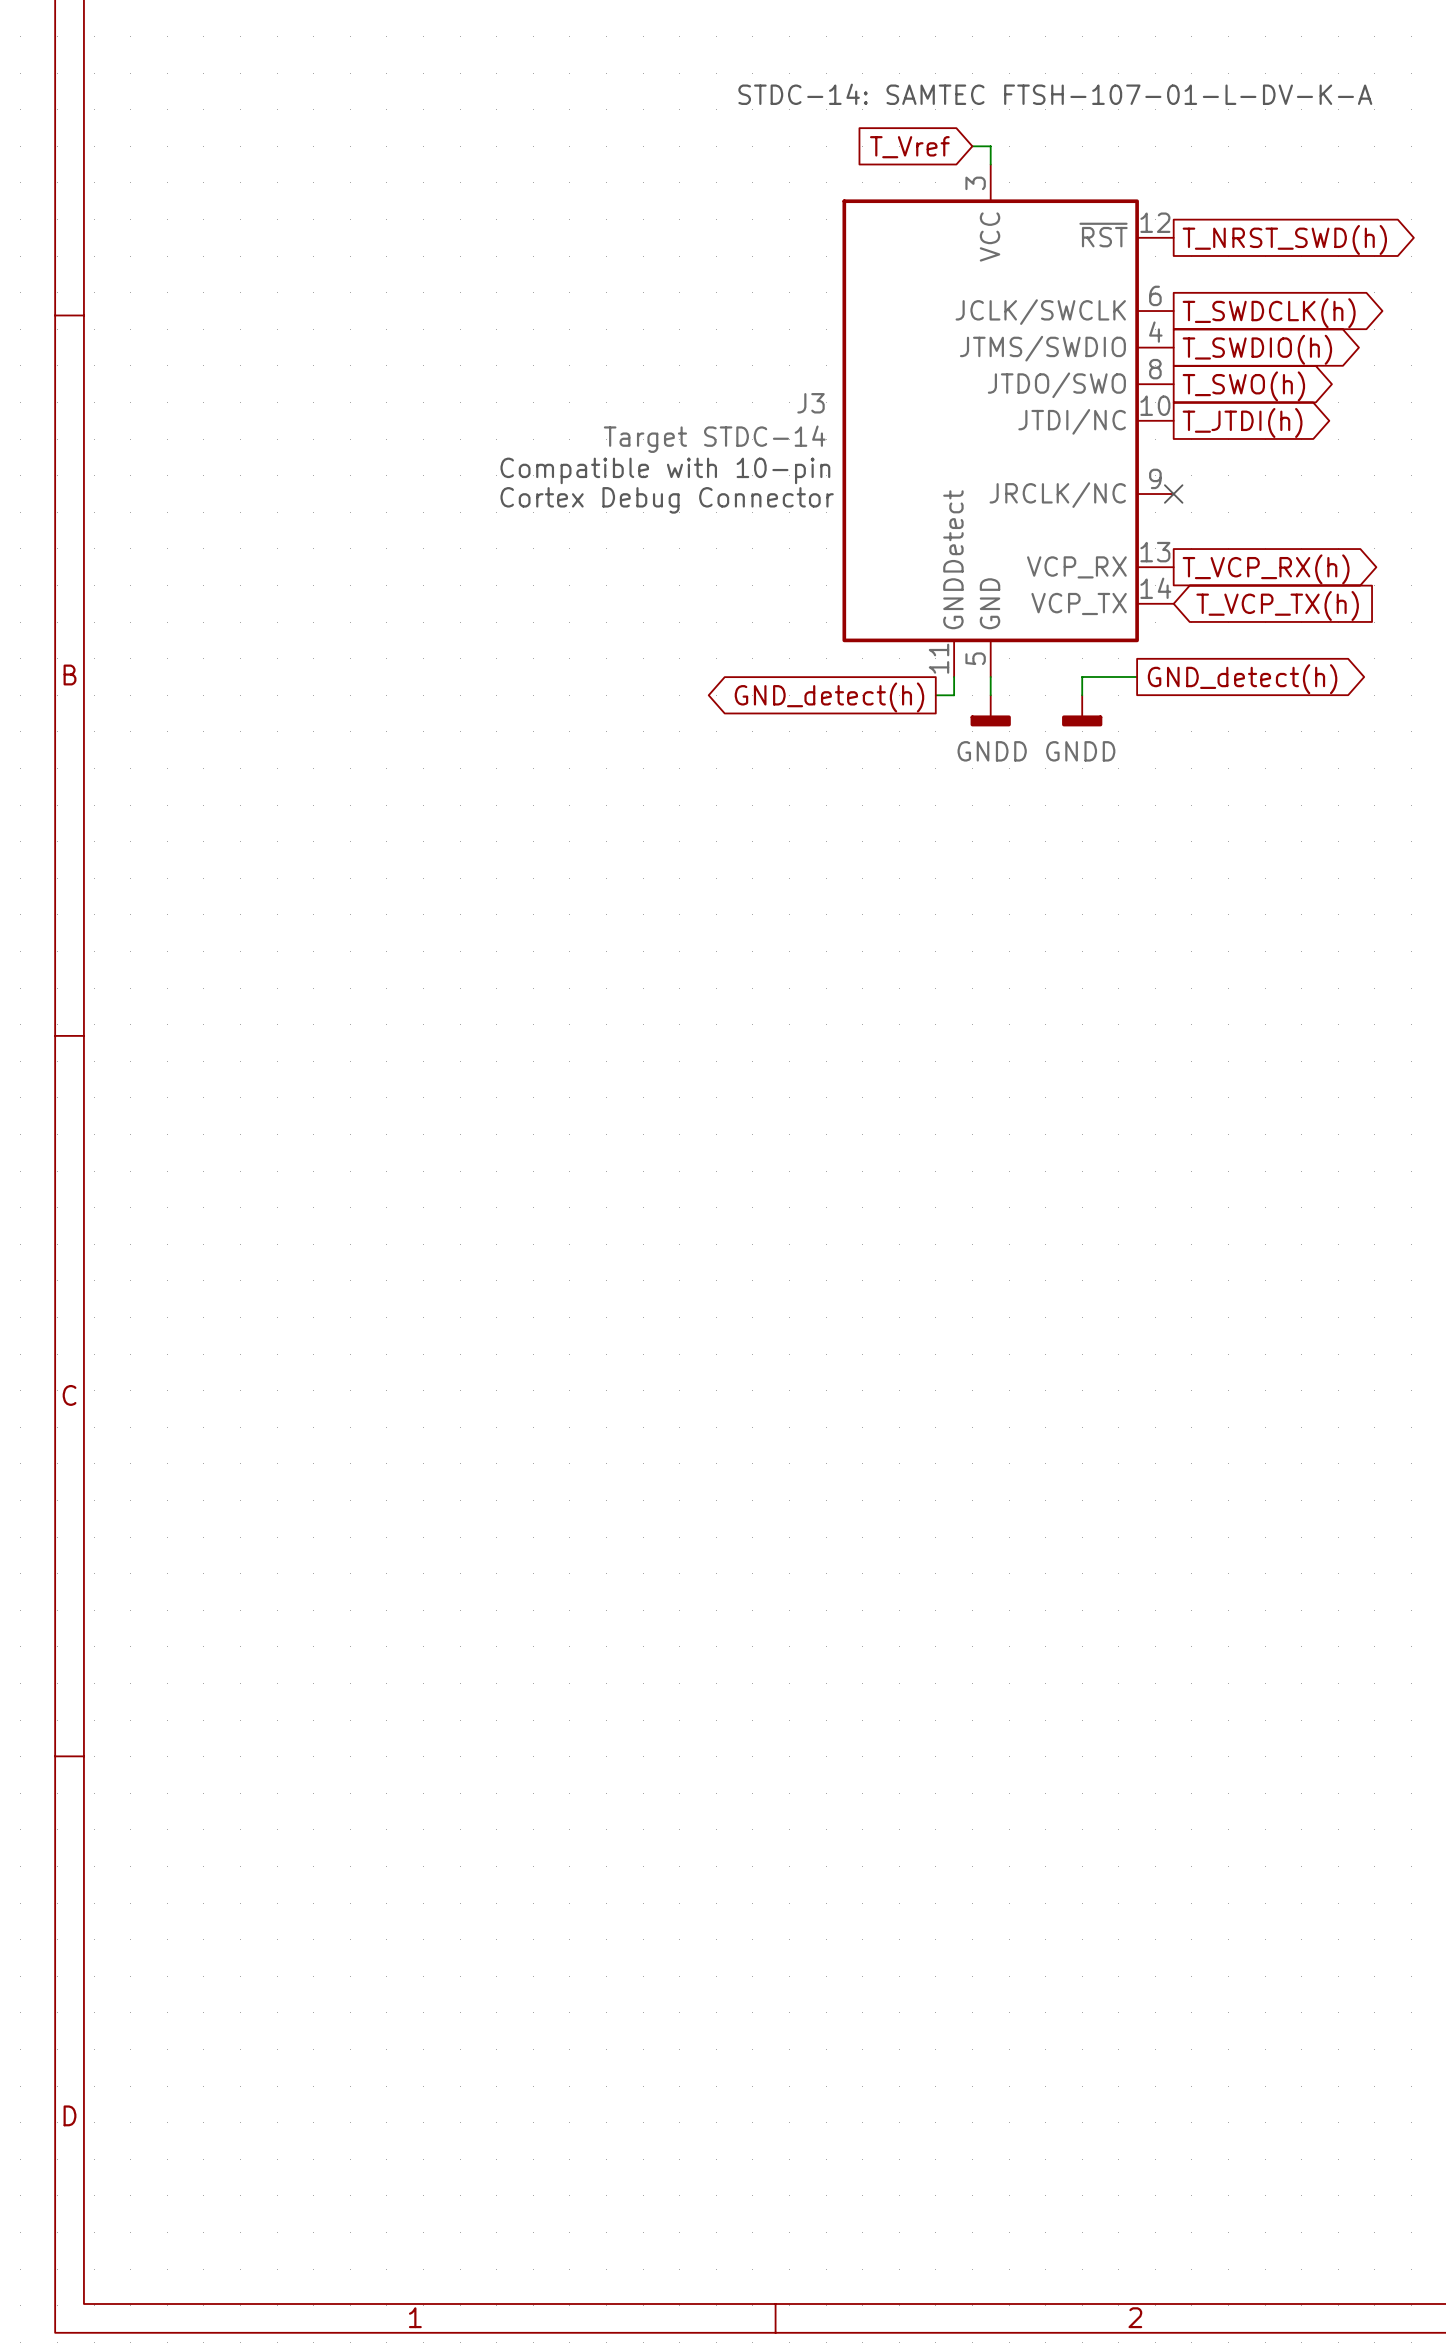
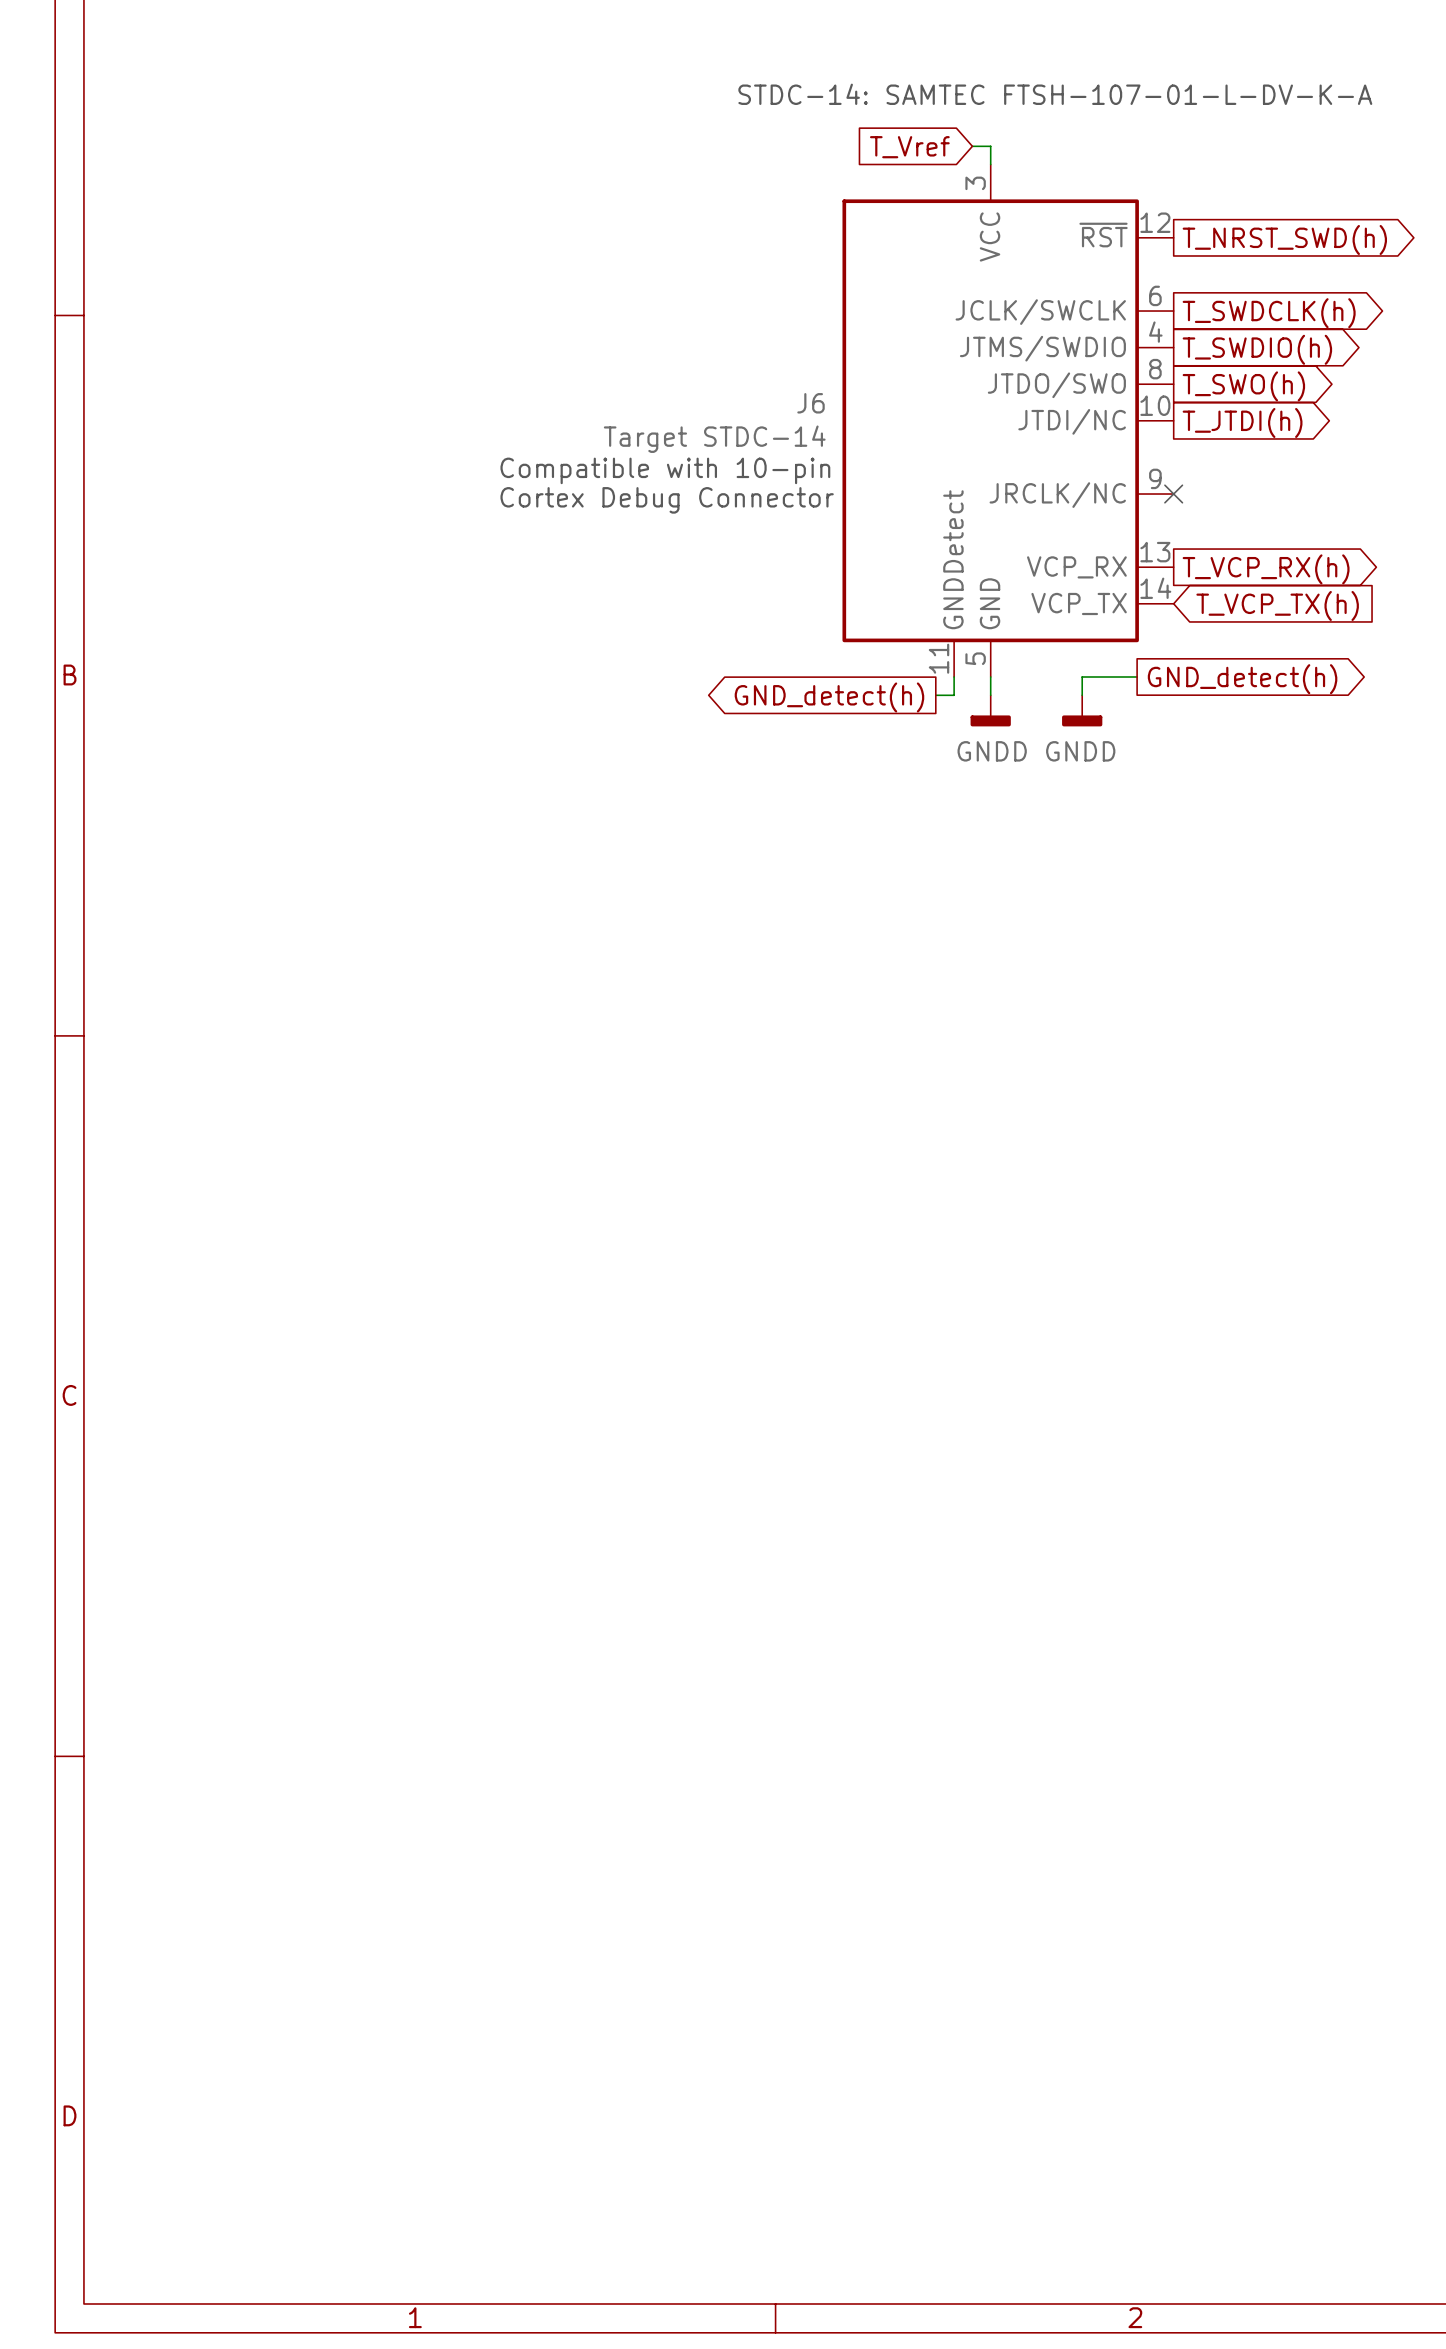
J3 name: J3 (811, 403) -> J6 (811, 403)

